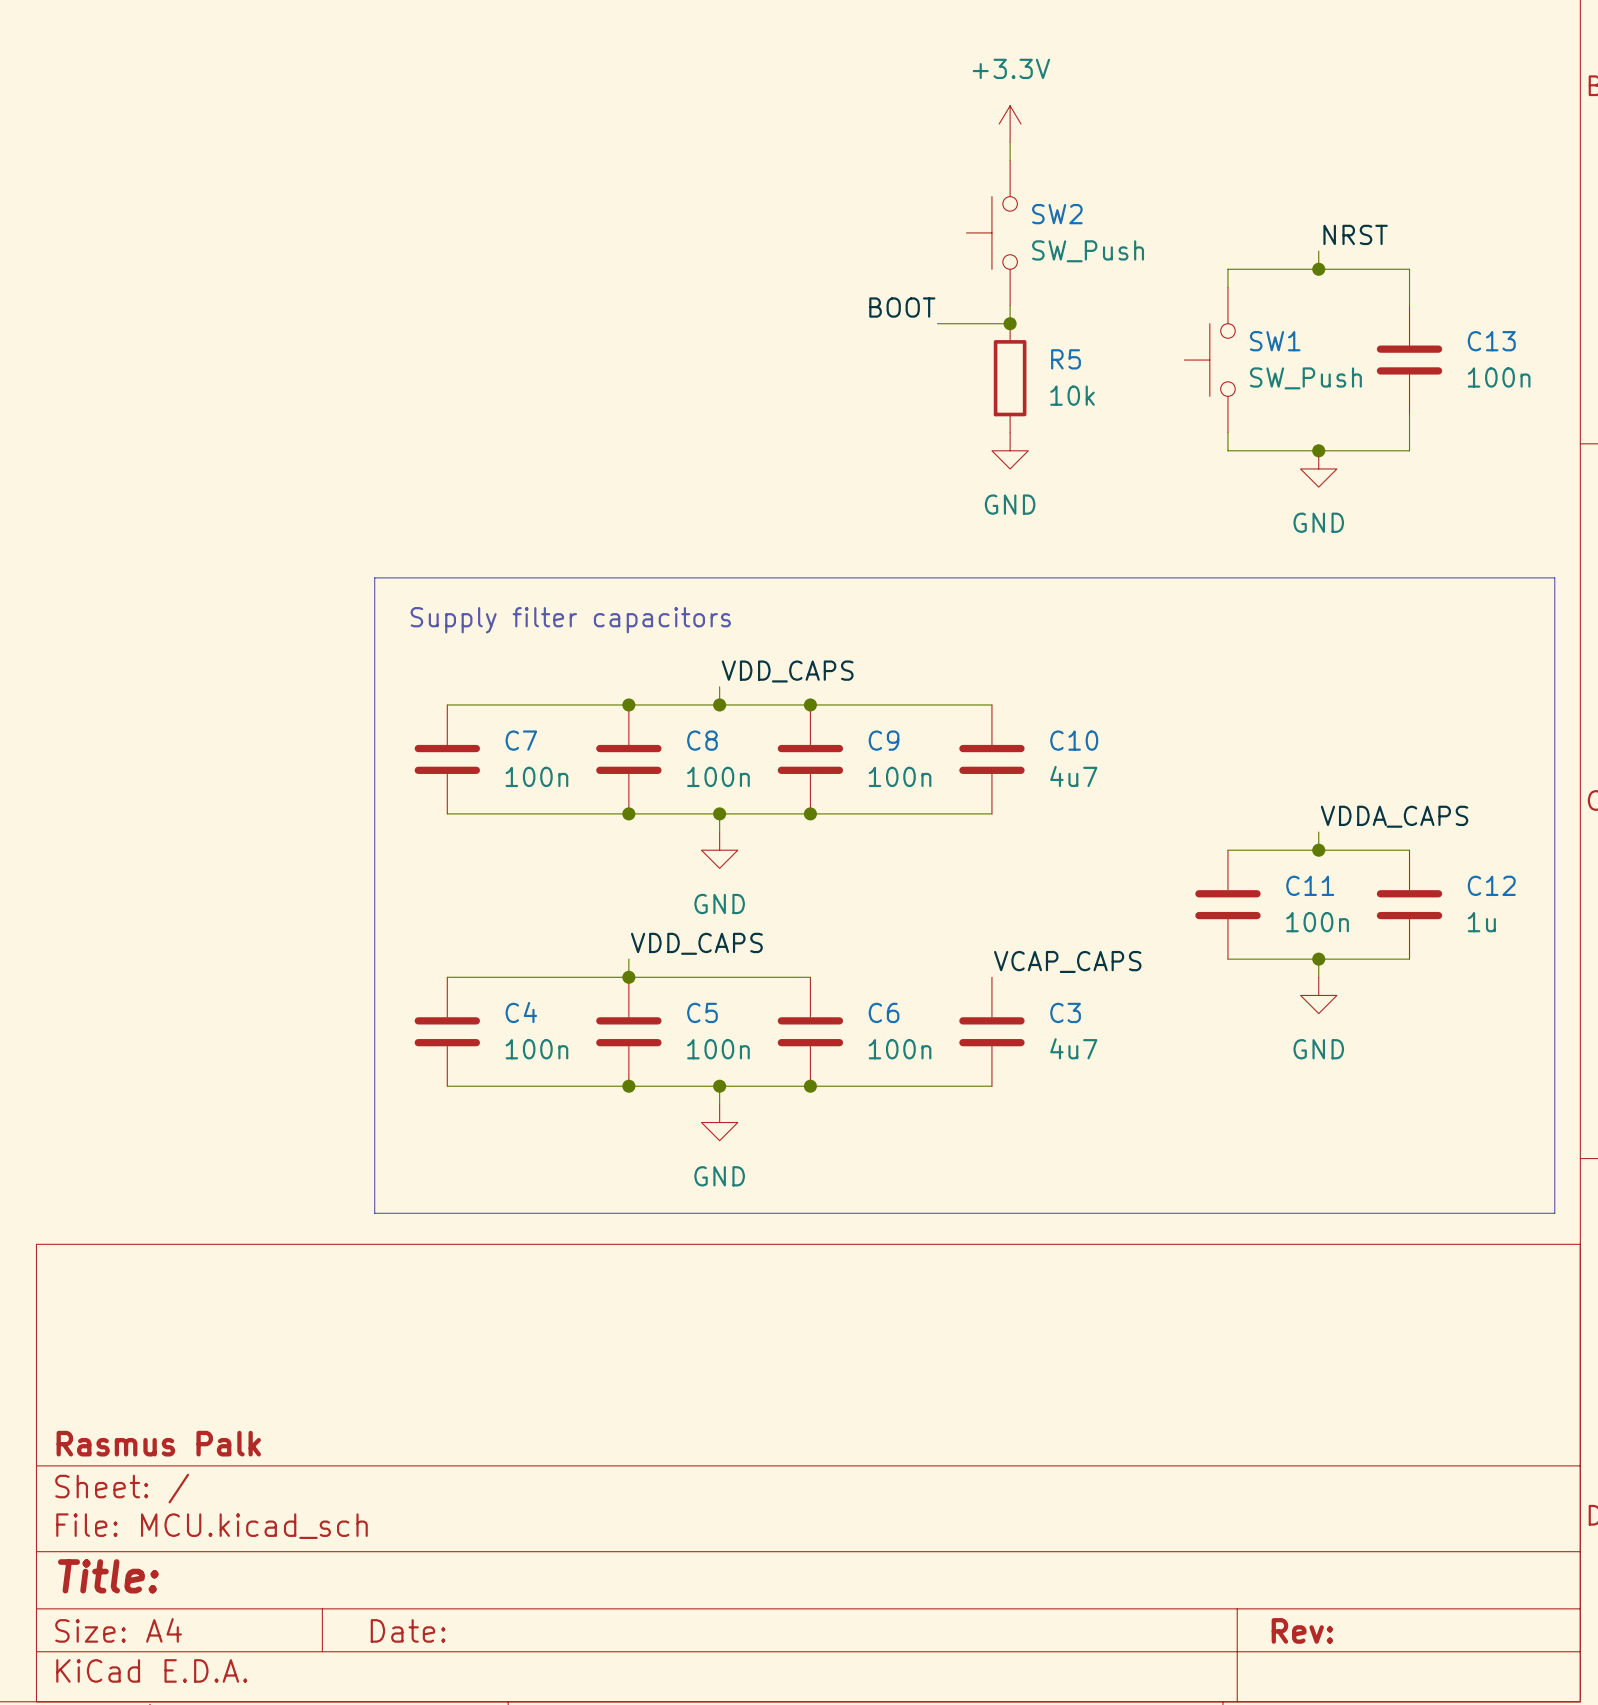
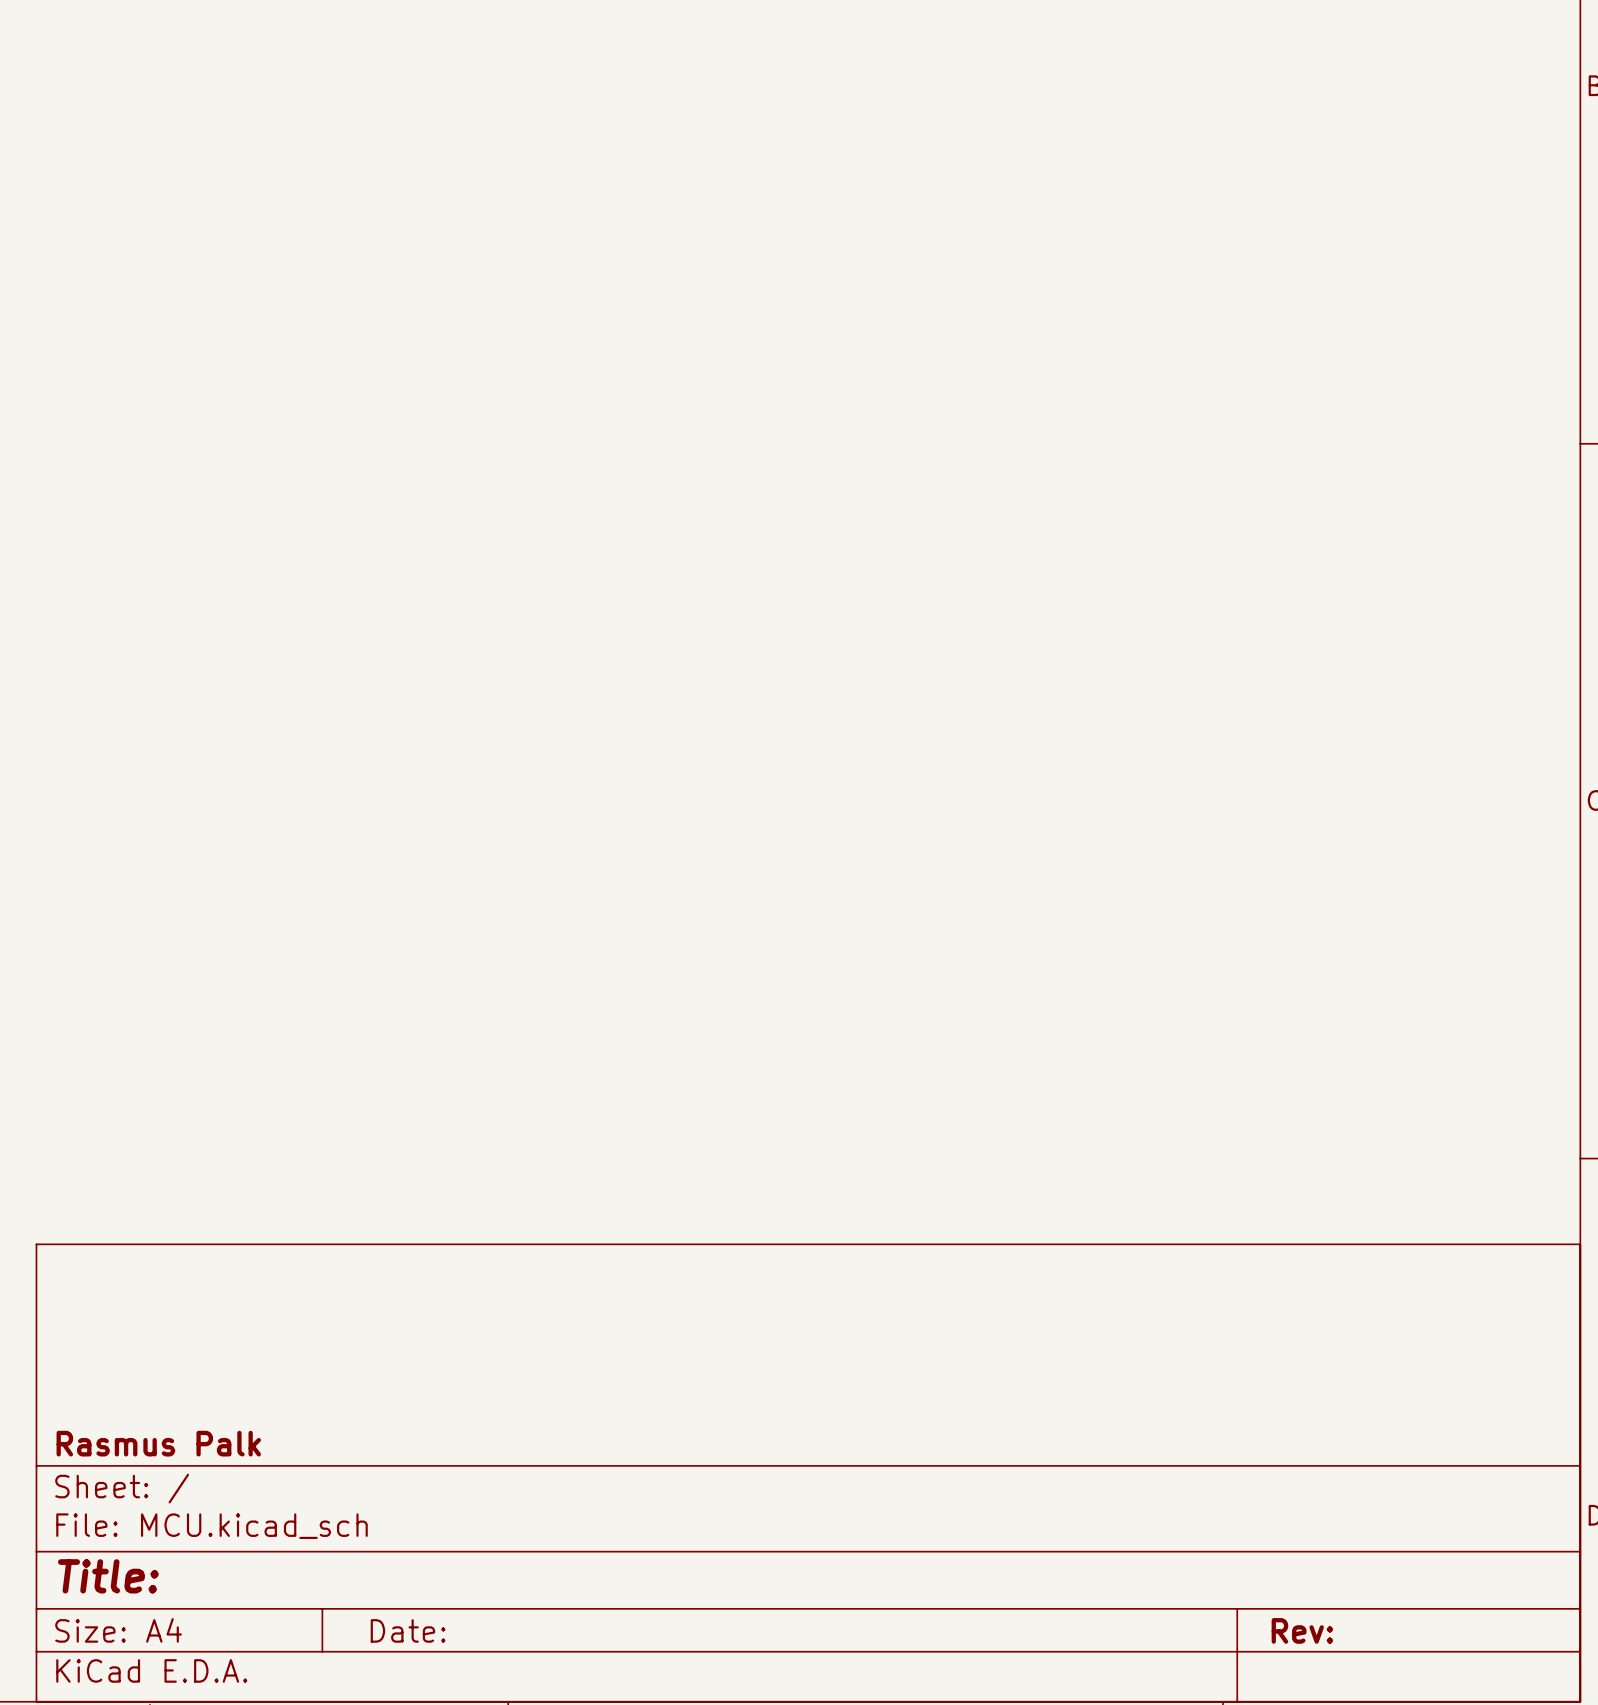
power symbol: +3.3V (1010, 124) -> none
wire: (1010, 142) (1010, 160) -> none
SW2: SW_Push (991, 232) -> none
label: NRST (1355, 234) -> none
wire: (1318, 251) (1318, 269) -> none
junction: (1318, 269) -> none
wire: (1227, 287) (1227, 269) (1409, 269) (1409, 305) -> none
wire: (1010, 305) (1010, 323) (937, 323) -> none
label: BOOT (902, 307) -> none
junction: (1010, 323) -> none
SW1: SW_Push (1209, 360) -> none
C13: 100n (1409, 360) -> none
R5: 10k (1010, 378) -> none
wire: (1409, 414) (1409, 450) (1227, 450) (1227, 432) -> none
power symbol: GND (1010, 450) -> none
junction: (1318, 450) -> none
power symbol: GND (1318, 468) -> none
line: (374, 577) (1554, 577) (1554, 1213) (374, 1213) (374, 577) -> none
text: Supply filter capacitors (570, 620) -> none
label: VDD_CAPS (787, 671) -> none
wire: (719, 686) (719, 704) -> none
wire: (447, 704) (991, 704) -> none
junction: (628, 704) -> none
junction: (719, 704) -> none
junction: (810, 704) -> none
C7: 100n (447, 759) -> none
C8: 100n (628, 759) -> none
C9: 100n (810, 759) -> none
C10: 4u7 (991, 759) -> none
wire: (447, 813) (991, 813) -> none
junction: (628, 813) -> none
wire: (719, 813) (719, 832) -> none
junction: (719, 813) -> none
junction: (810, 813) -> none
label: VDDA_CAPS (1394, 816) -> none
wire: (1318, 832) (1318, 850) -> none
power symbol: GND (719, 850) -> none
wire: (1227, 850) (1409, 850) -> none
junction: (1318, 850) -> none
C11: 100n (1227, 904) -> none
C12: 1u (1409, 904) -> none
label: VDD_CAPS (696, 943) -> none
wire: (628, 959) (628, 977) -> none
wire: (1227, 959) (1409, 959) -> none
wire: (1318, 959) (1318, 977) -> none
junction: (1318, 959) -> none
label: VCAP_CAPS (1067, 961) -> none
wire: (447, 977) (810, 977) -> none
junction: (628, 977) -> none
power symbol: GND (1318, 995) -> none
C4: 100n (447, 1031) -> none
C5: 100n (628, 1031) -> none
C6: 100n (810, 1031) -> none
C3: 4u7 (991, 1031) -> none
wire: (447, 1086) (991, 1086) -> none
junction: (628, 1086) -> none
wire: (719, 1086) (719, 1104) -> none
junction: (719, 1086) -> none
junction: (810, 1086) -> none
power symbol: GND (719, 1122) -> none

